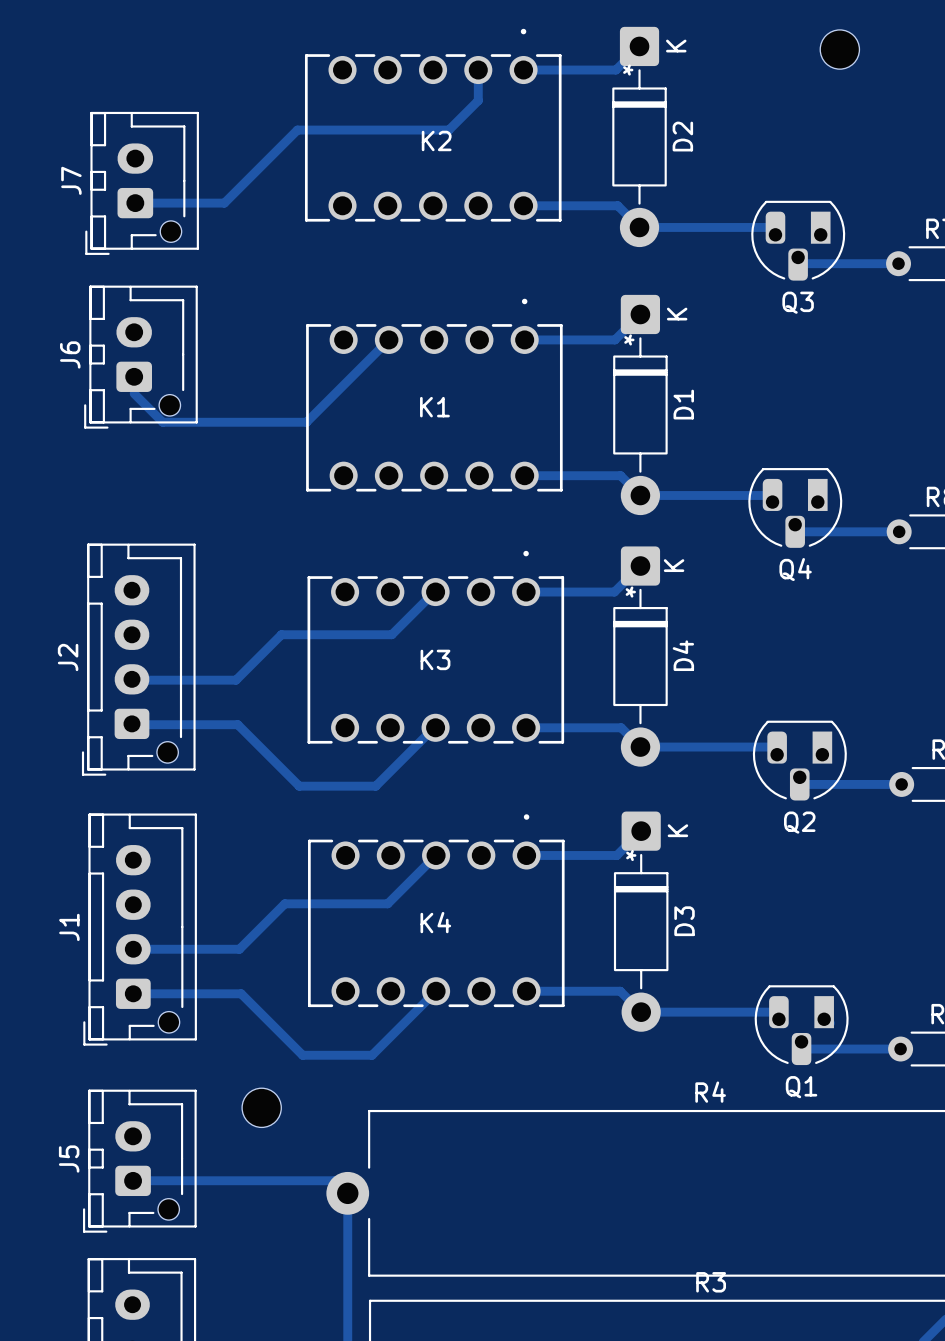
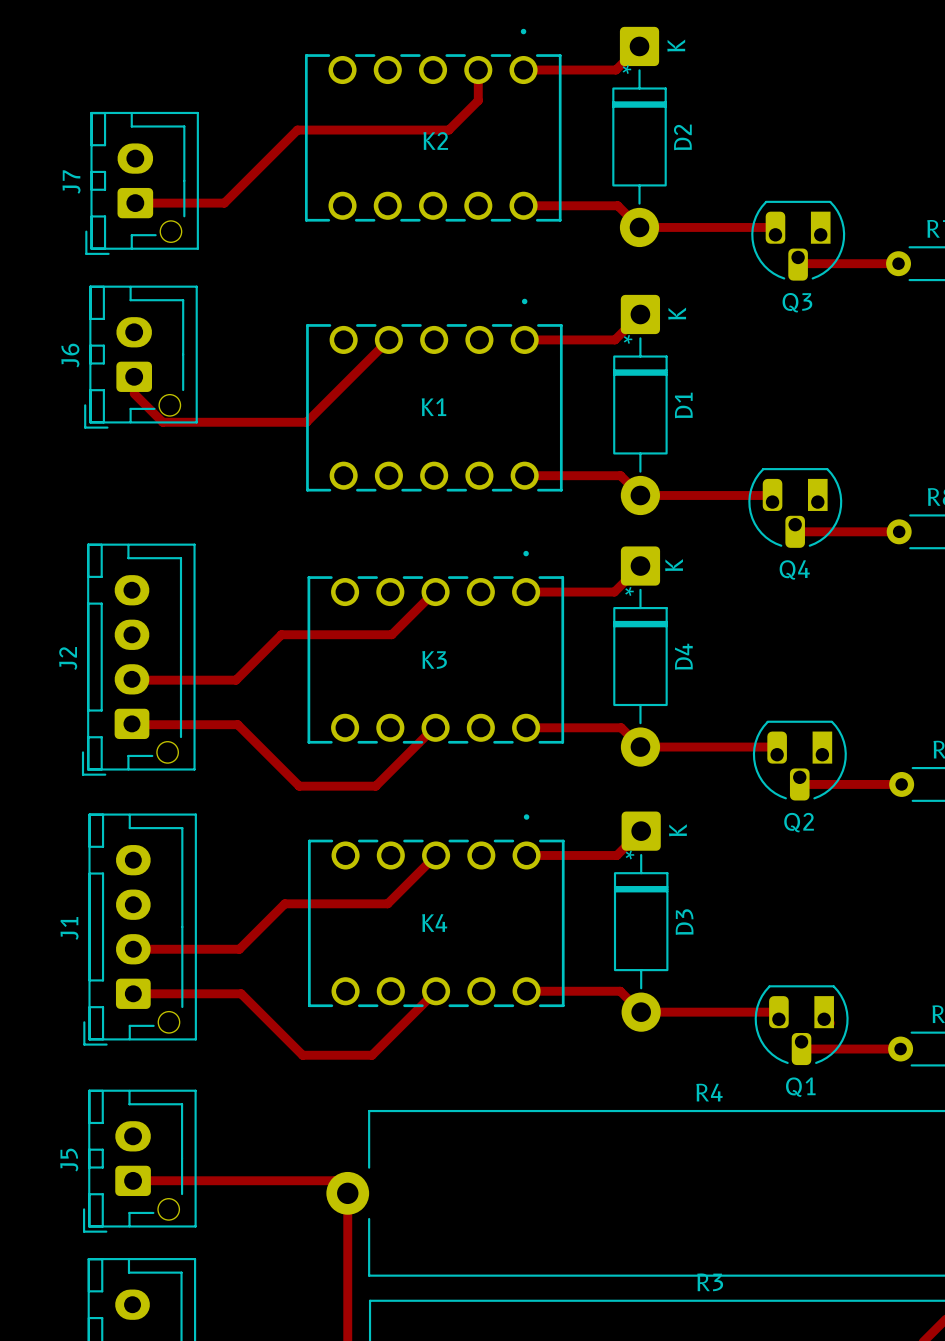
part: (839, 49) -> none
part: (261, 1107) -> none

